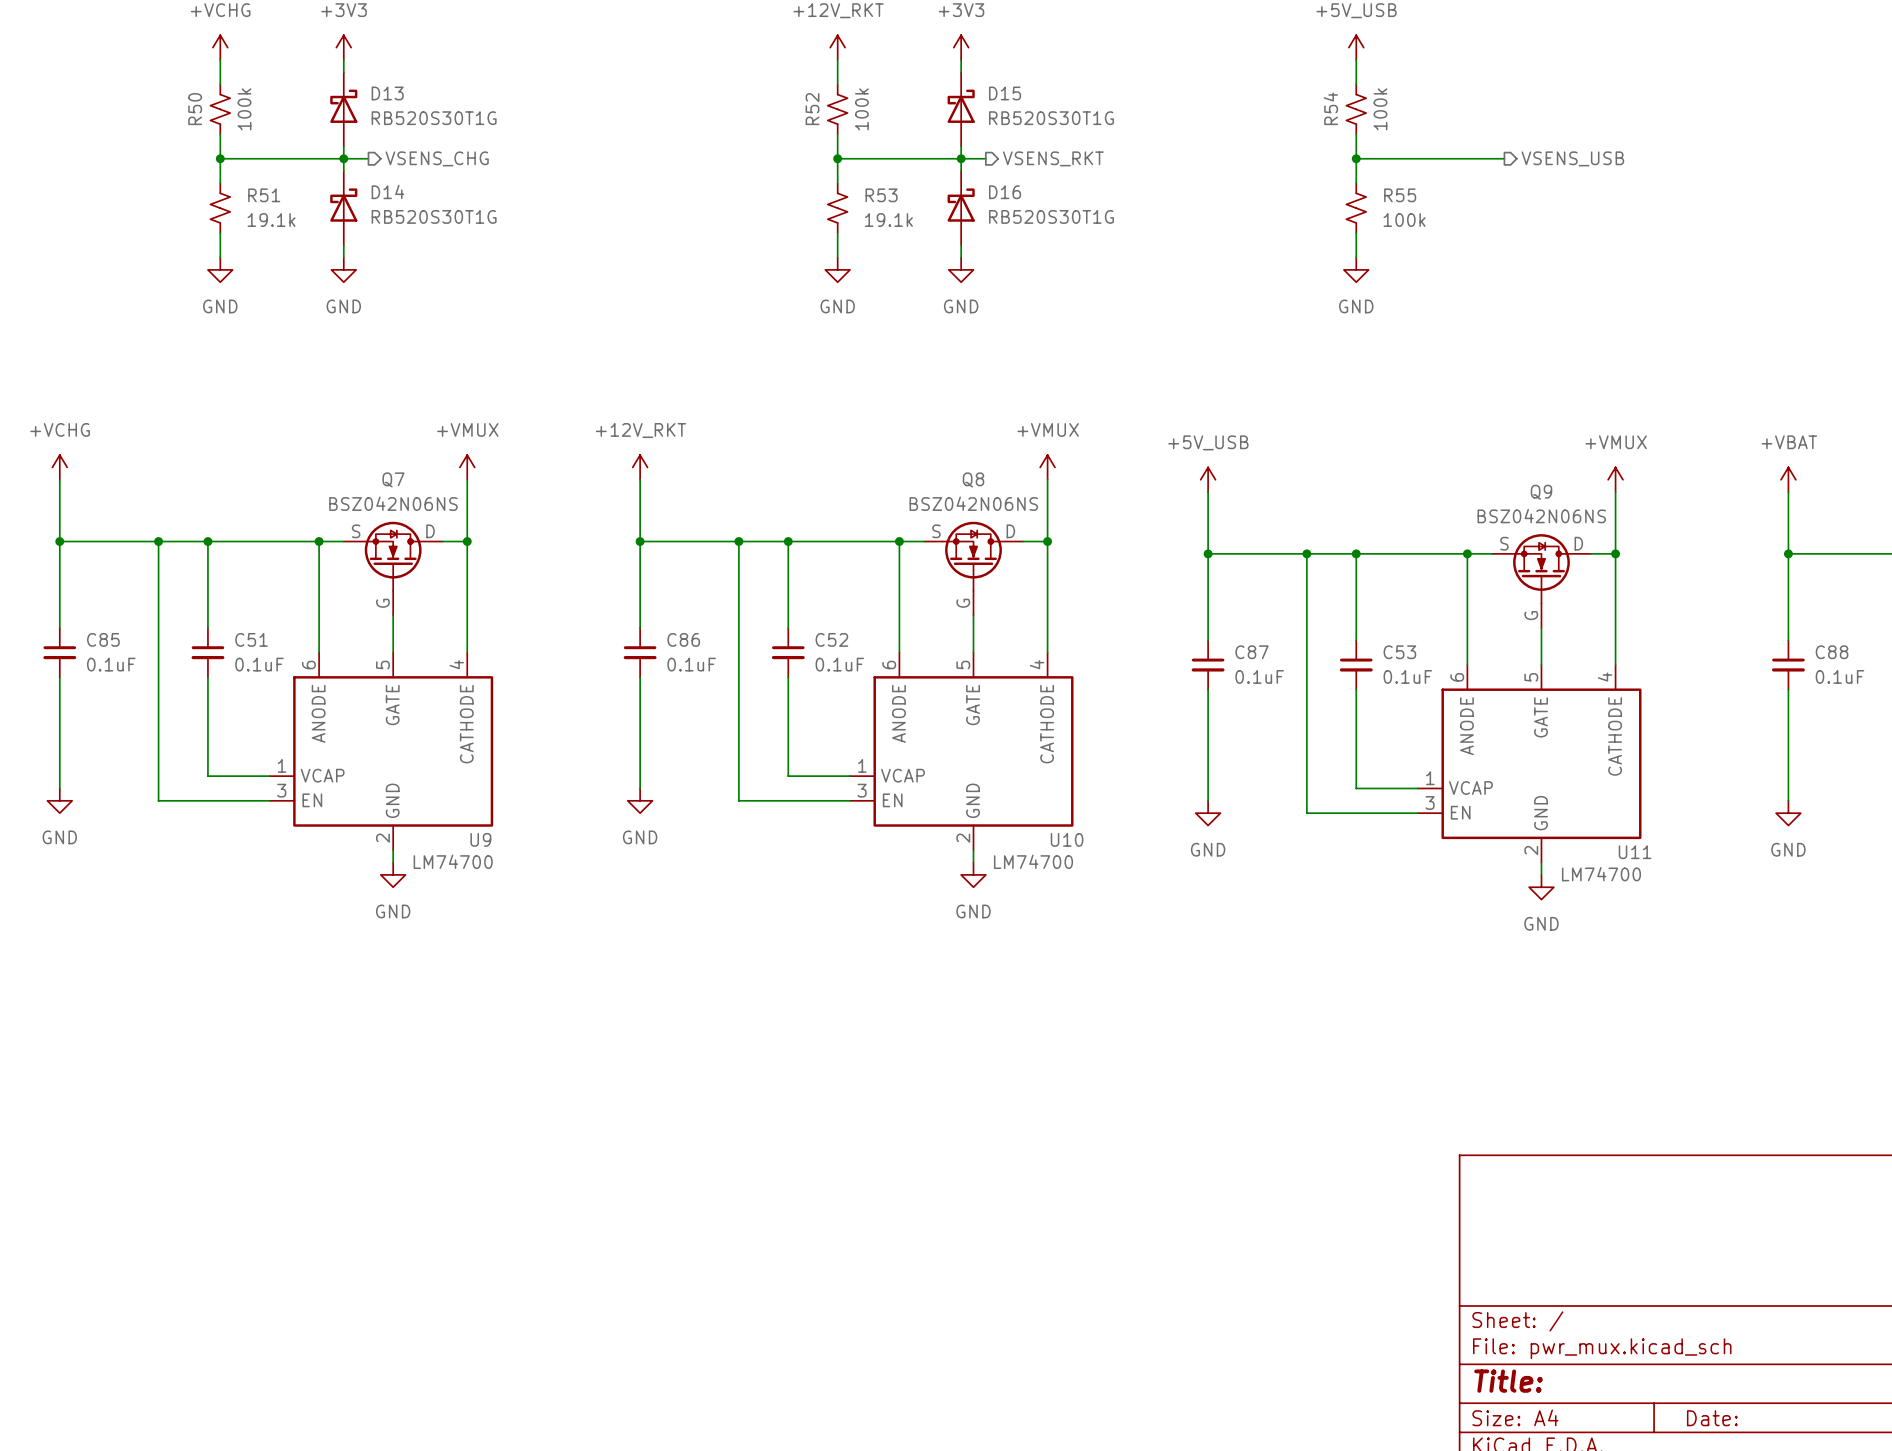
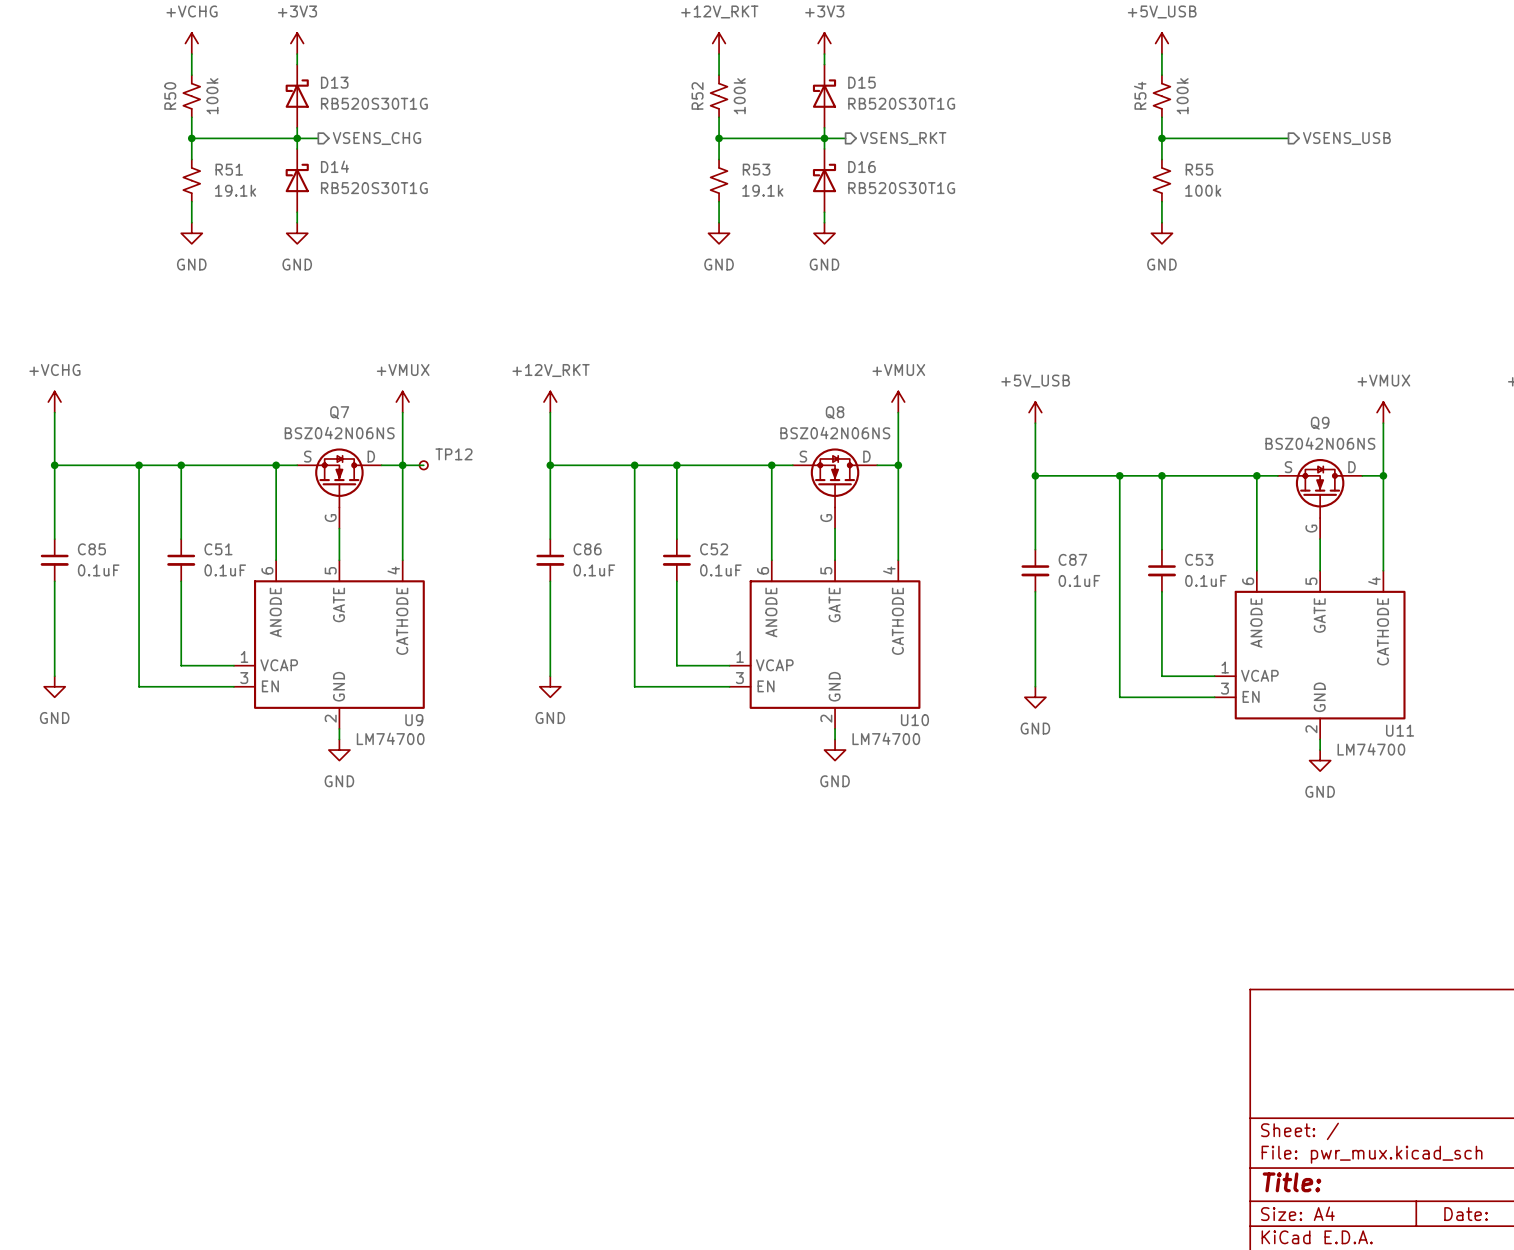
wire: none -> (402, 465) (423, 465)
TP12: none -> (423, 465)

